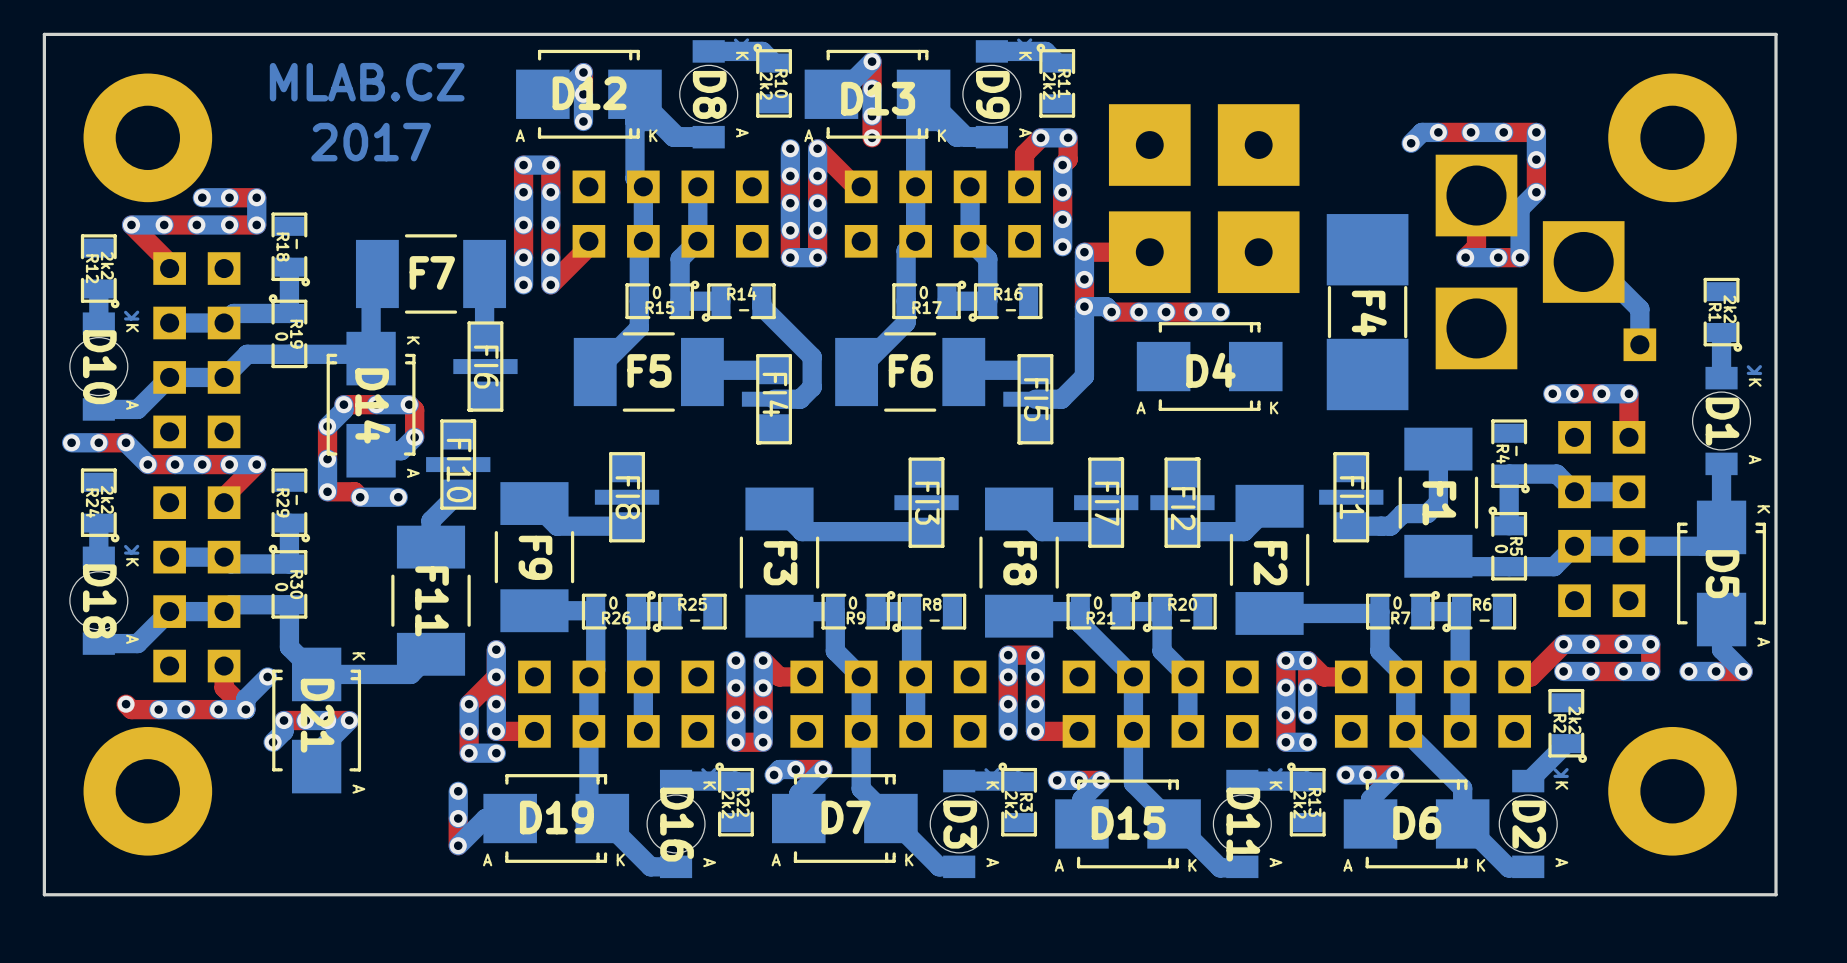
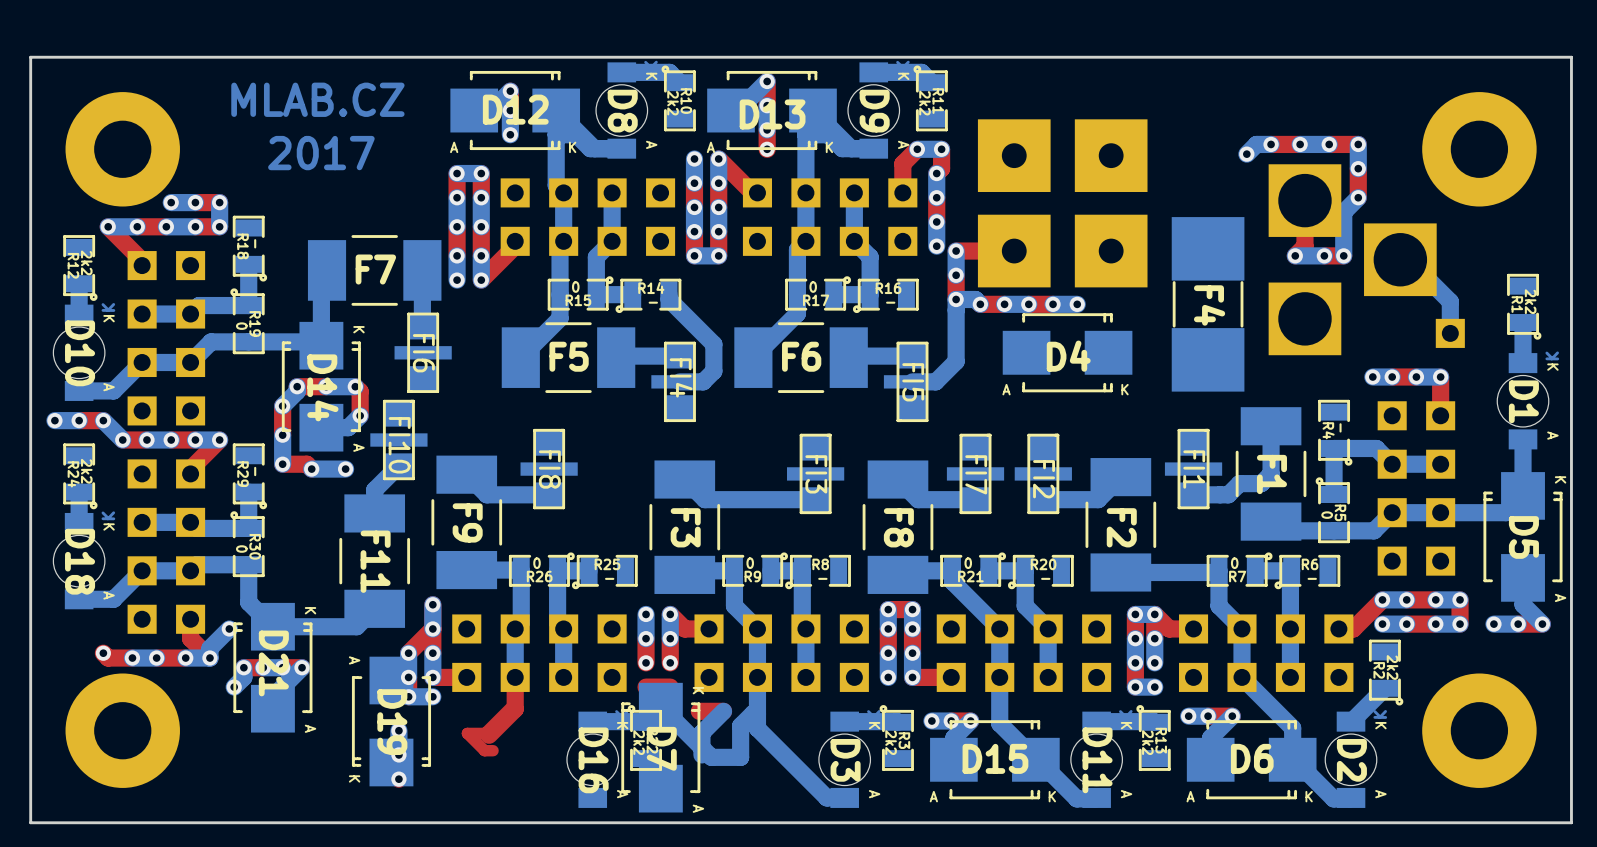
bottom track: (735, 715) (735, 742) -> none
bottom track: (763, 715) (763, 742) -> none
bottom track: (588, 731) (588, 805) (650, 866) (676, 866) -> none
bottom track: none -> (757, 677) (757, 713) (753, 713) (740, 725) (740, 757) (711, 757) (660, 706)
via: (735, 742) -> none
via: (763, 742) -> none
bottom track: (795, 769) (779, 769) (774, 774) -> none
via: (795, 769) -> none
via: (823, 769) -> none
via: (774, 774) -> none
top track: none -> (489, 735) (515, 709) (515, 677) (515, 703) (485, 733) (467, 733) (484, 750) (493, 750)
bottom track: (510, 818) (485, 818) (458, 845) -> none
D19 rotation: 0° (556, 818) -> 90° clockwise (391, 721)
D19 position: (556, 818) -> (391, 721)
D7 rotation: 0° (844, 818) -> 90° counterclockwise (660, 747)
D7 position: (844, 818) -> (660, 747)

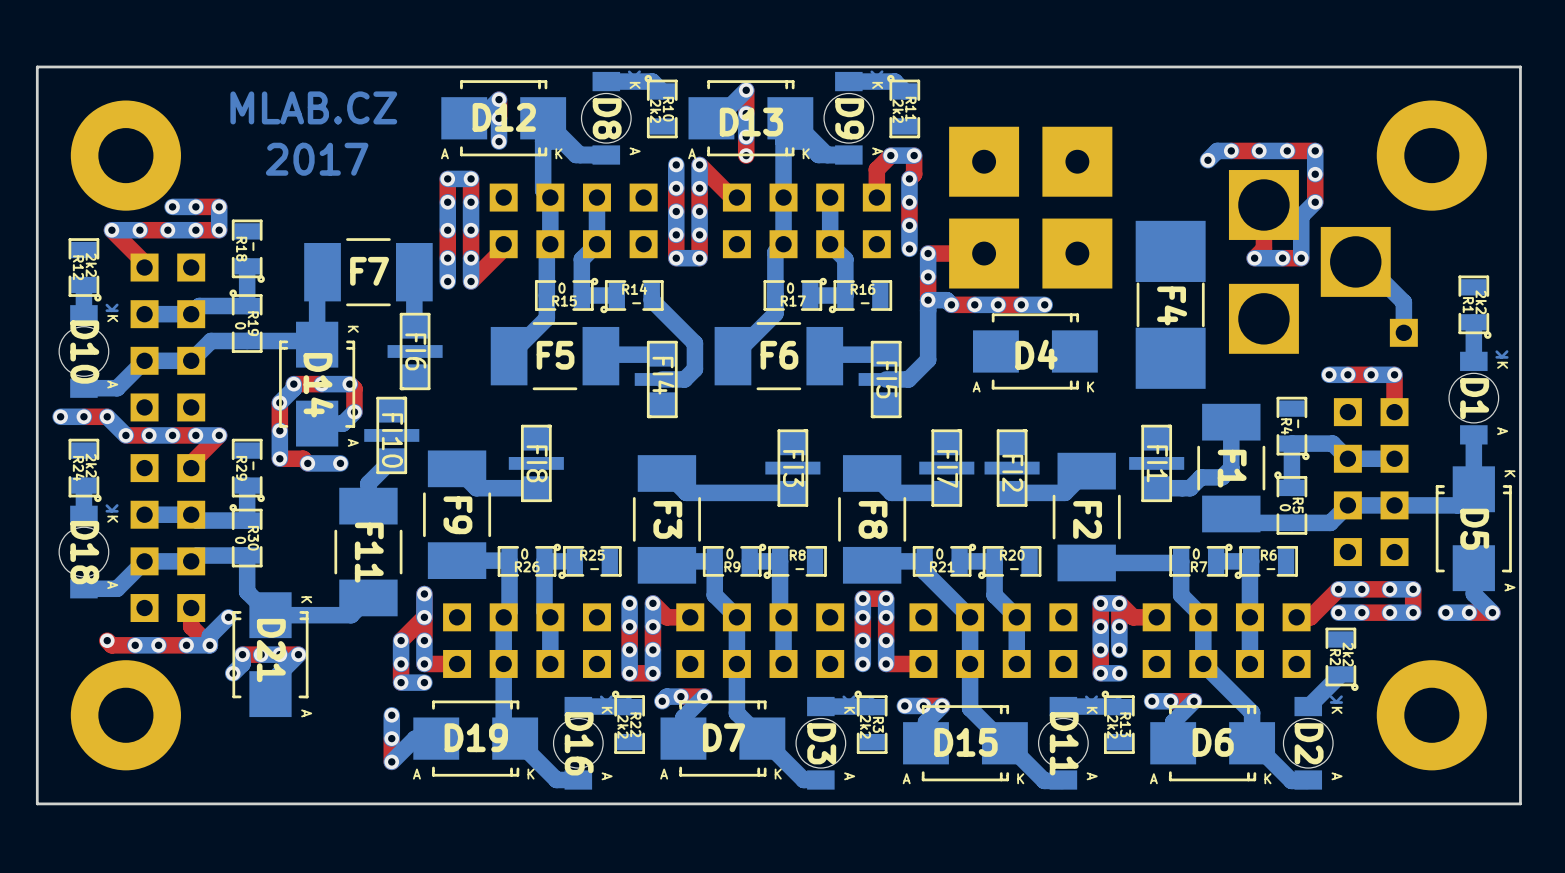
bottom track: none -> (629, 649) (629, 673)
bottom track: none -> (652, 649) (652, 673)
bottom track: none -> (503, 663) (503, 727) (556, 779) (578, 779)
bottom track: (757, 677) (757, 713) (753, 713) (740, 725) (740, 757) (711, 757) (660, 706) -> none
via: none -> (629, 673)
via: none -> (652, 673)
bottom track: none -> (680, 696) (666, 696) (662, 701)
via: none -> (680, 696)
via: none -> (704, 696)
via: none -> (662, 701)
D19 rotation: 0° (391, 721) -> 90° counterclockwise (475, 738)
D19 position: (391, 721) -> (475, 738)
top track: (489, 735) (515, 709) (515, 677) (515, 703) (485, 733) (467, 733) (484, 750) (493, 750) -> none
D7 rotation: 0° (660, 747) -> 90° clockwise (722, 738)
D7 position: (660, 747) -> (722, 738)
bottom track: none -> (436, 738) (415, 738) (391, 761)

